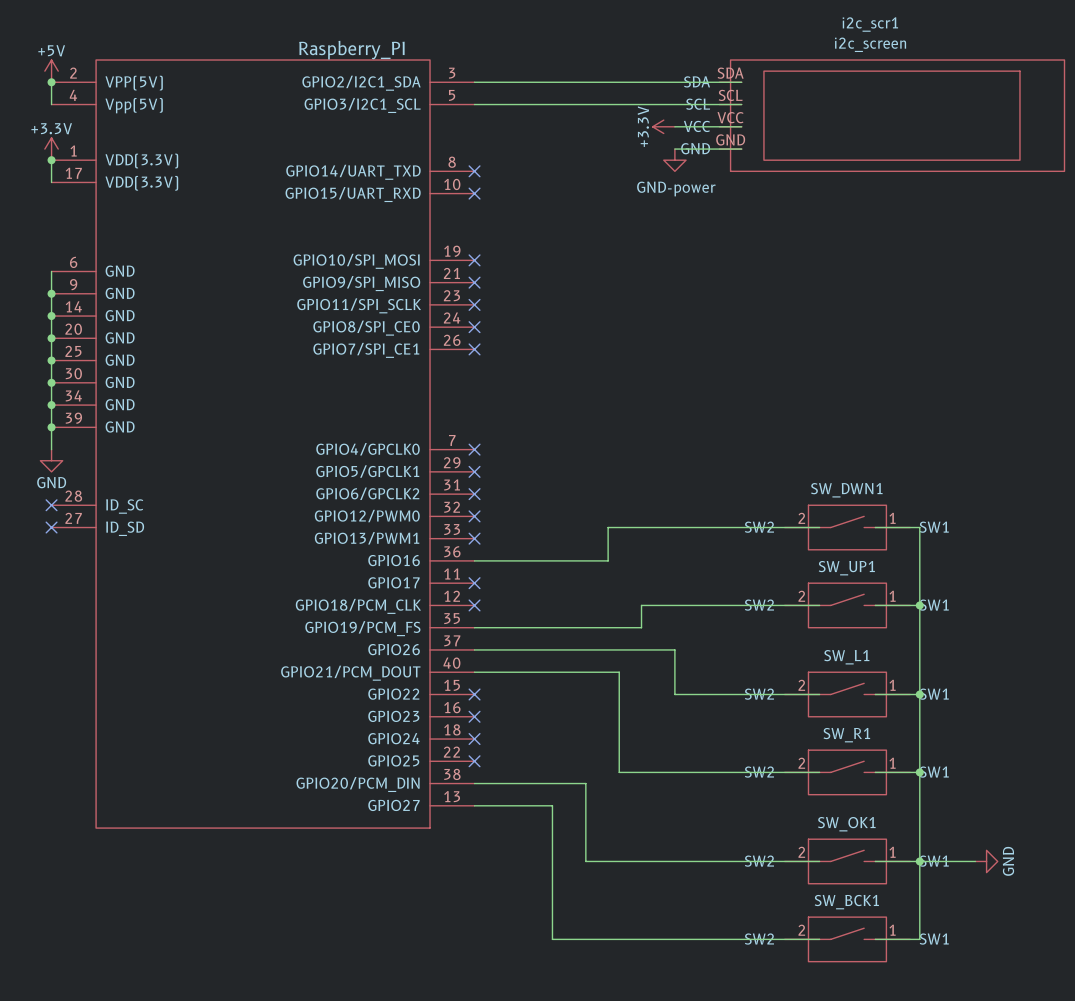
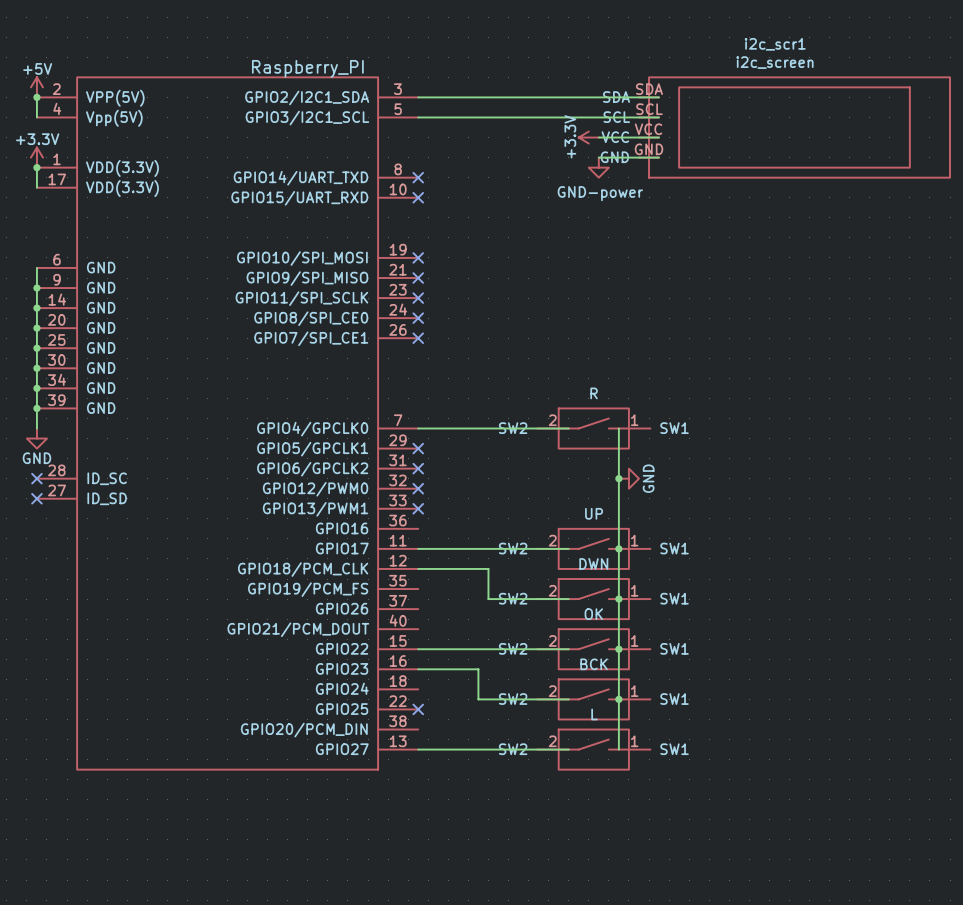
wire: none -> (418, 428) (568, 428)
no-connect mark: (474, 449) -> none
R: none -> (593, 428)
wire: none -> (618, 428) (618, 749)
junction: none -> (618, 478)
power symbol: none -> GND (628, 478)
wire: (819, 527) (608, 527) (608, 560) (474, 560) -> none
SW_DWN1: (847, 527) -> none
wire: (875, 527) (919, 527) (919, 939) (875, 939) -> none
wire: none -> (418, 548) (568, 548)
no-connect mark: (474, 583) -> none
UP: none -> (593, 548)
junction: none -> (618, 548)
wire: none -> (418, 568) (488, 568) (488, 599) (568, 599)
no-connect mark: (474, 605) -> none
wire: (819, 605) (641, 605) (641, 627) (474, 627) -> none
SW_UP1: (847, 605) -> none
wire: (875, 605) (919, 605) -> none
junction: (919, 605) -> none
DWN: none -> (593, 599)
junction: none -> (618, 599)
wire: (474, 649) (674, 649) (674, 694) (819, 694) -> none
wire: (474, 672) (619, 672) (619, 772) (819, 772) -> none
wire: none -> (418, 649) (568, 649)
no-connect mark: (474, 694) -> none
OK: none -> (593, 649)
junction: none -> (618, 649)
SW_L1: (847, 694) -> none
wire: (875, 694) (919, 694) -> none
junction: (919, 694) -> none
wire: none -> (418, 669) (478, 669) (478, 699) (568, 699)
no-connect mark: (474, 716) -> none
no-connect mark: (474, 739) -> none
BCK: none -> (593, 699)
junction: none -> (618, 699)
SW_R1: (847, 772) -> none
wire: (875, 772) (919, 772) -> none
junction: (919, 772) -> none
wire: (474, 783) (585, 783) (585, 861) (819, 861) -> none
wire: (552, 805) (552, 939) (819, 939) -> (488, 749) (568, 749)
L: none -> (593, 749)
SW_OK1: (847, 861) -> none
wire: (875, 861) (975, 861) -> none
junction: (919, 861) -> none
power symbol: GND (986, 861) -> none
SW_BCK1: (847, 939) -> none

